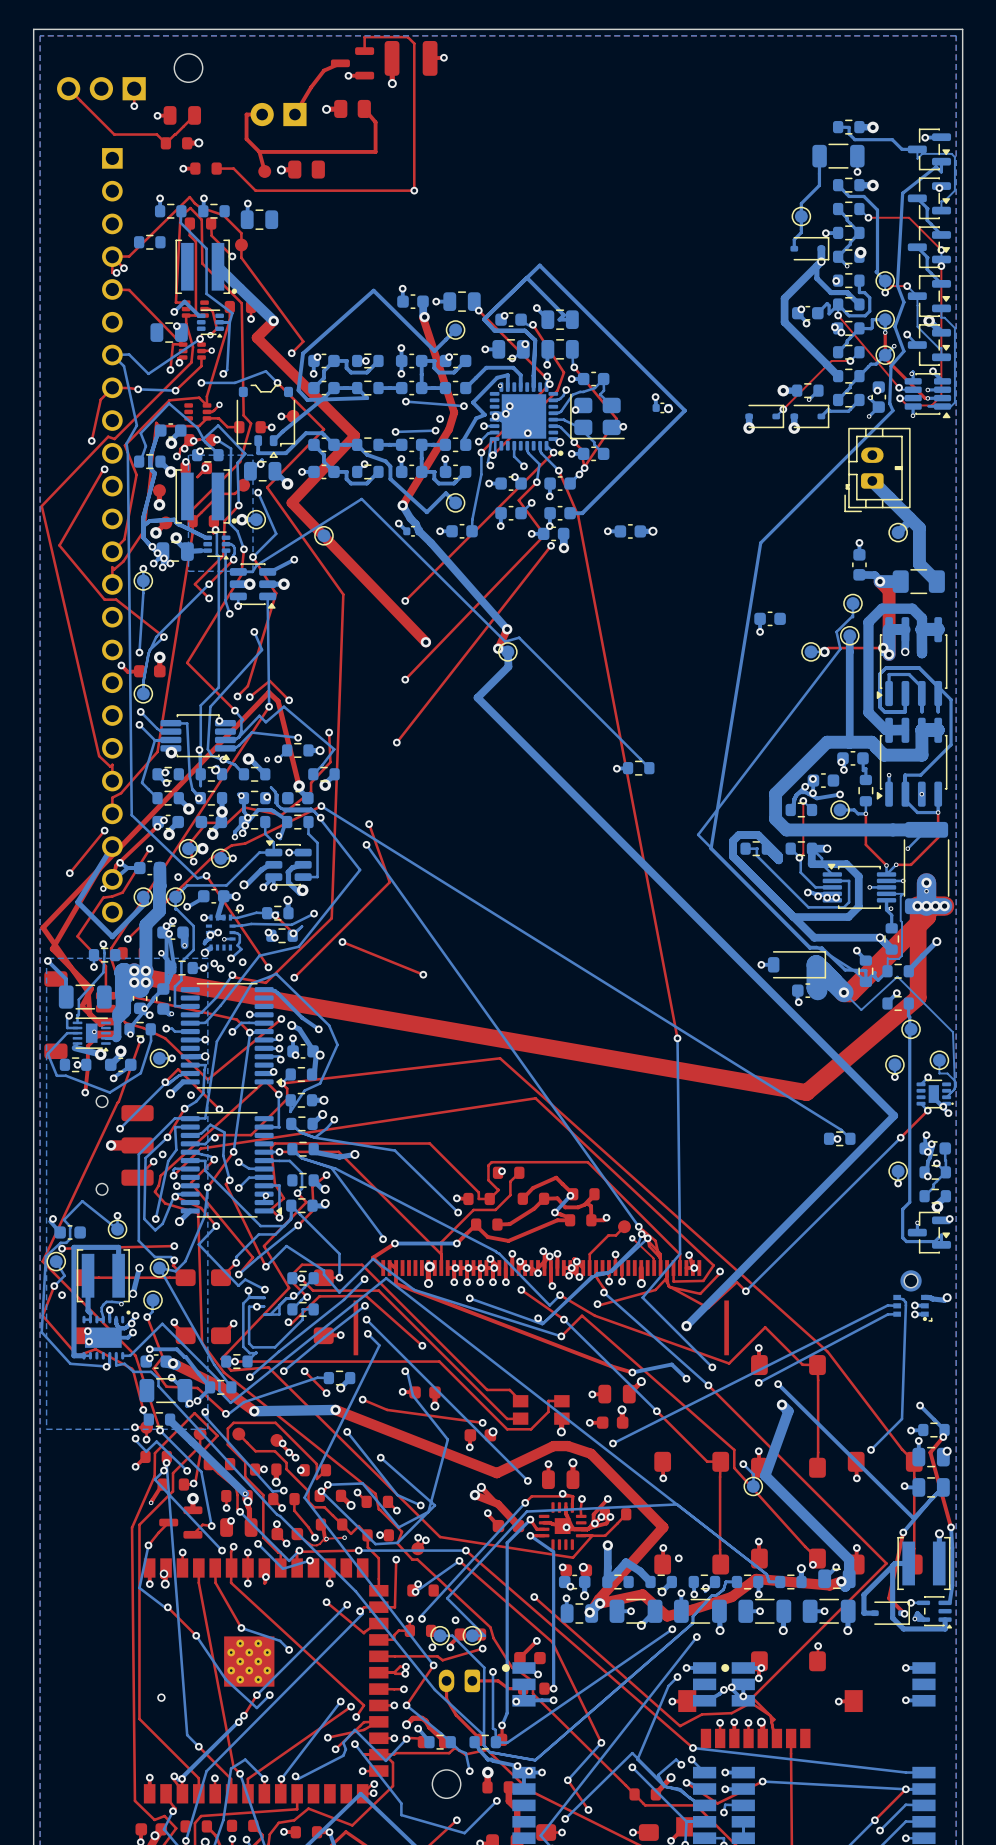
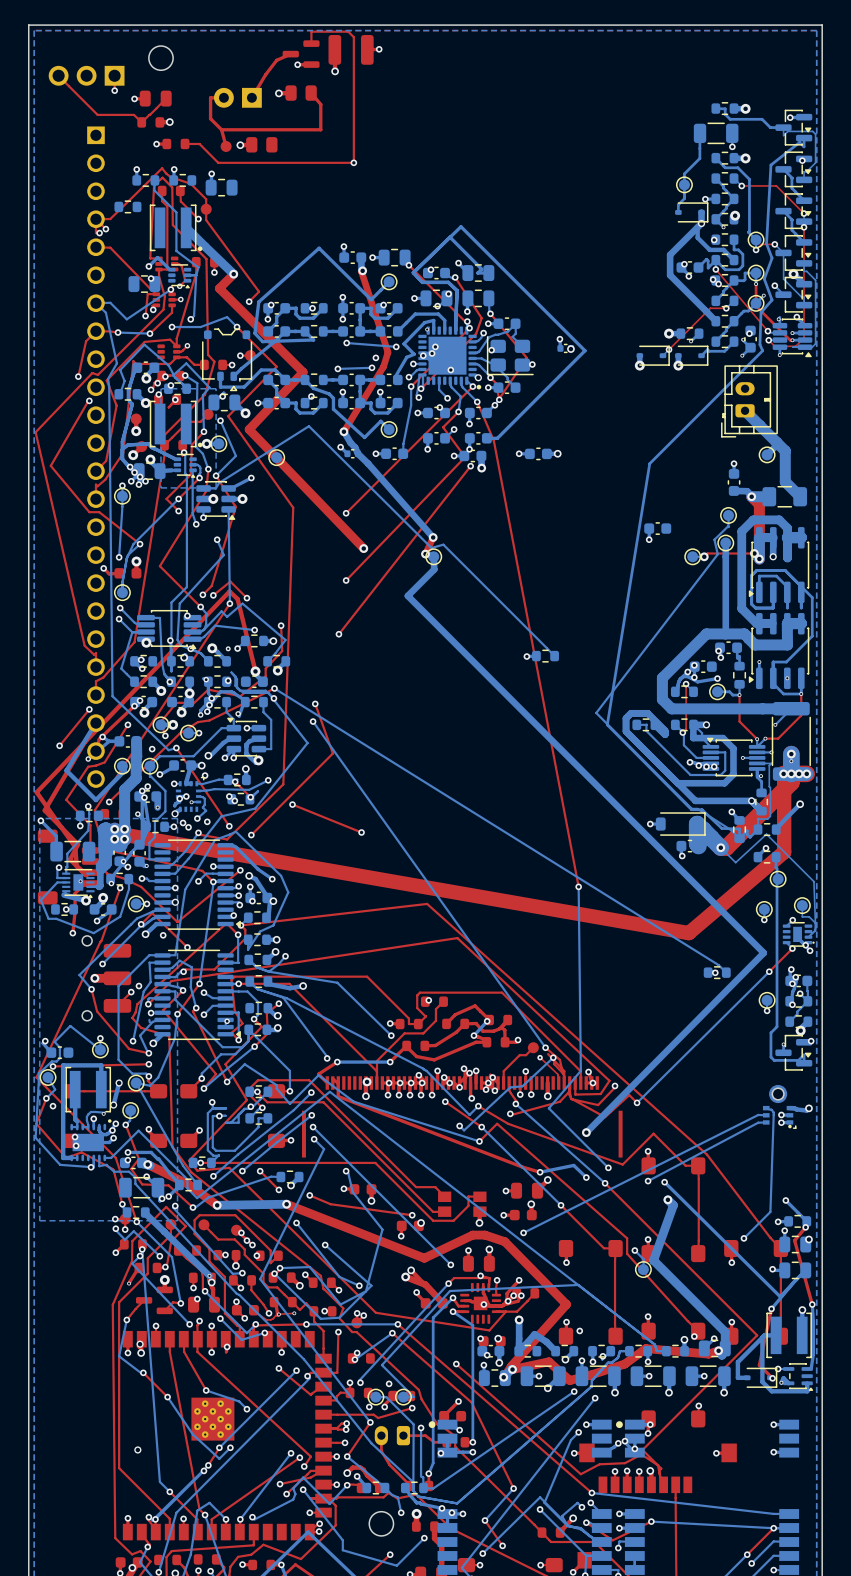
bottom track: (190, 1065) (205, 1065) (203, 1093) (196, 1101) (184, 1108) -> none
bottom track: none -> (155, 910) (137, 918) (79, 975) (91, 989)
top track: (184, 1108) (167, 1137) -> none
via: (184, 1108) -> none
bottom track: (167, 1137) (145, 1158) (144, 1218) (155, 1230) (162, 1223) (174, 1194) (190, 1194) -> none
via: (167, 1137) -> none
top track: none -> (91, 989) (97, 1011) (129, 1048) (148, 1053)
via: none -> (91, 989)
bottom track: none -> (155, 1021) (140, 1035) (148, 1053)
top track: (175, 1196) (201, 1208) (216, 1226) -> none
via: (175, 1196) -> none
bottom track: (216, 1226) (198, 1244) (238, 1285) (245, 1279) (264, 1289) -> none
via: (216, 1226) -> none
via: none -> (148, 1053)
bottom track: (641, 1234) (638, 1242) (607, 1273) (591, 1276) (542, 1324) (469, 1298) -> none
via: (641, 1234) -> none
via: (264, 1289) -> none
via: (469, 1298) -> none
top track: (288, 1322) (290, 1324) (319, 1296) (366, 1296) (422, 1345) -> none
via: (288, 1322) -> none
via: (422, 1345) -> none

